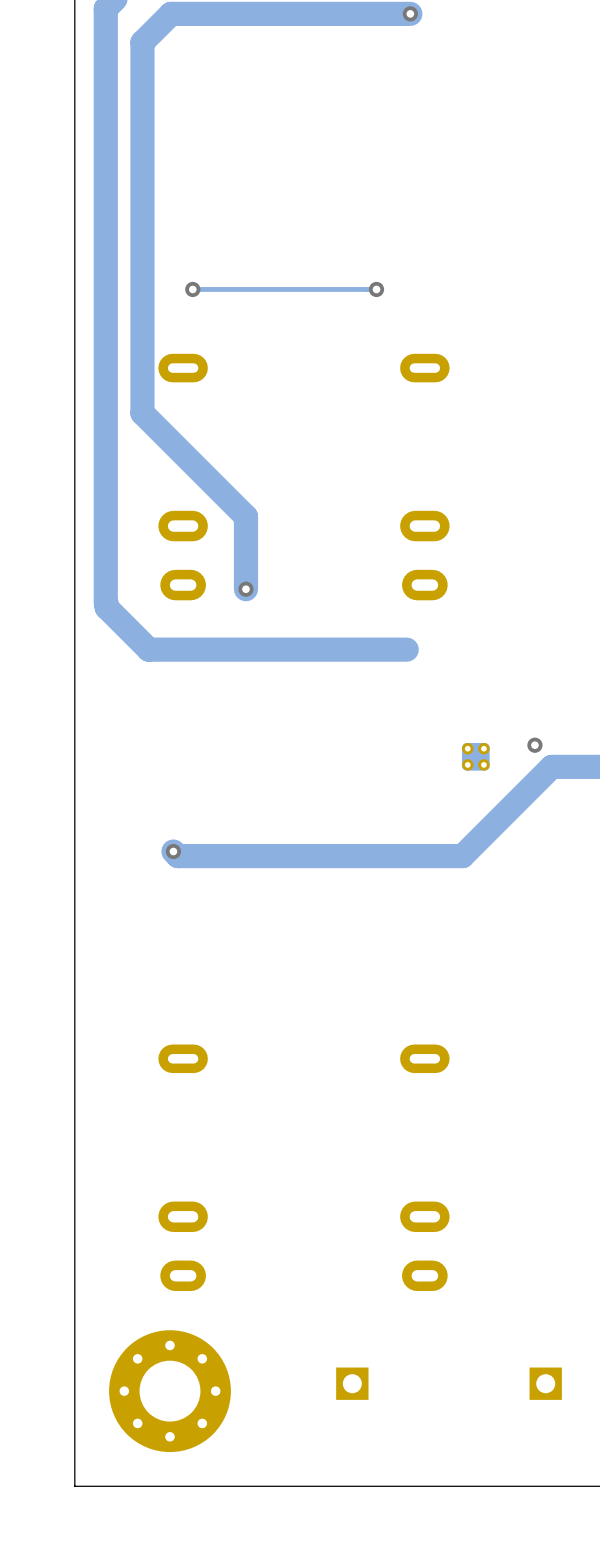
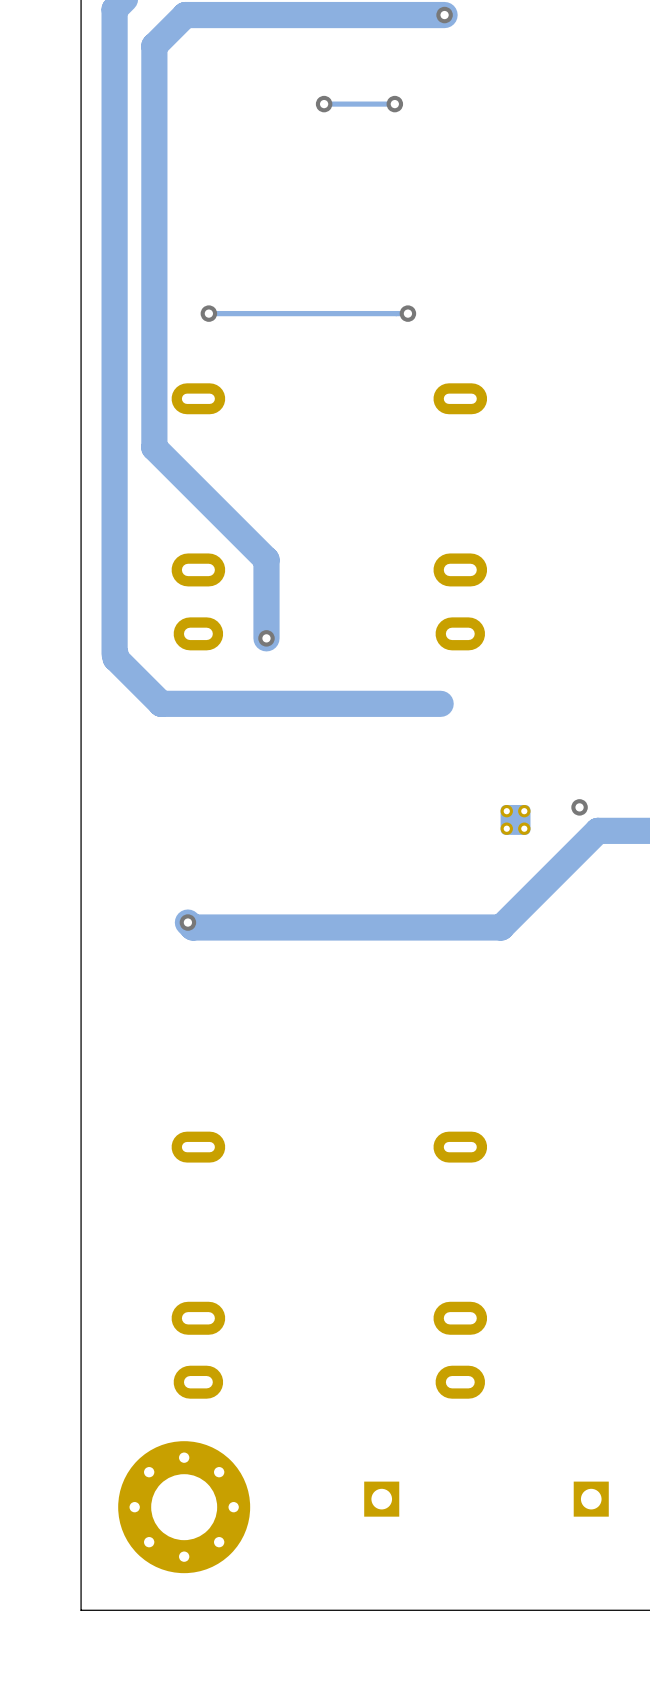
via: none -> (324, 104)
track: none -> (394, 104) (324, 104)
via: none -> (394, 104)

